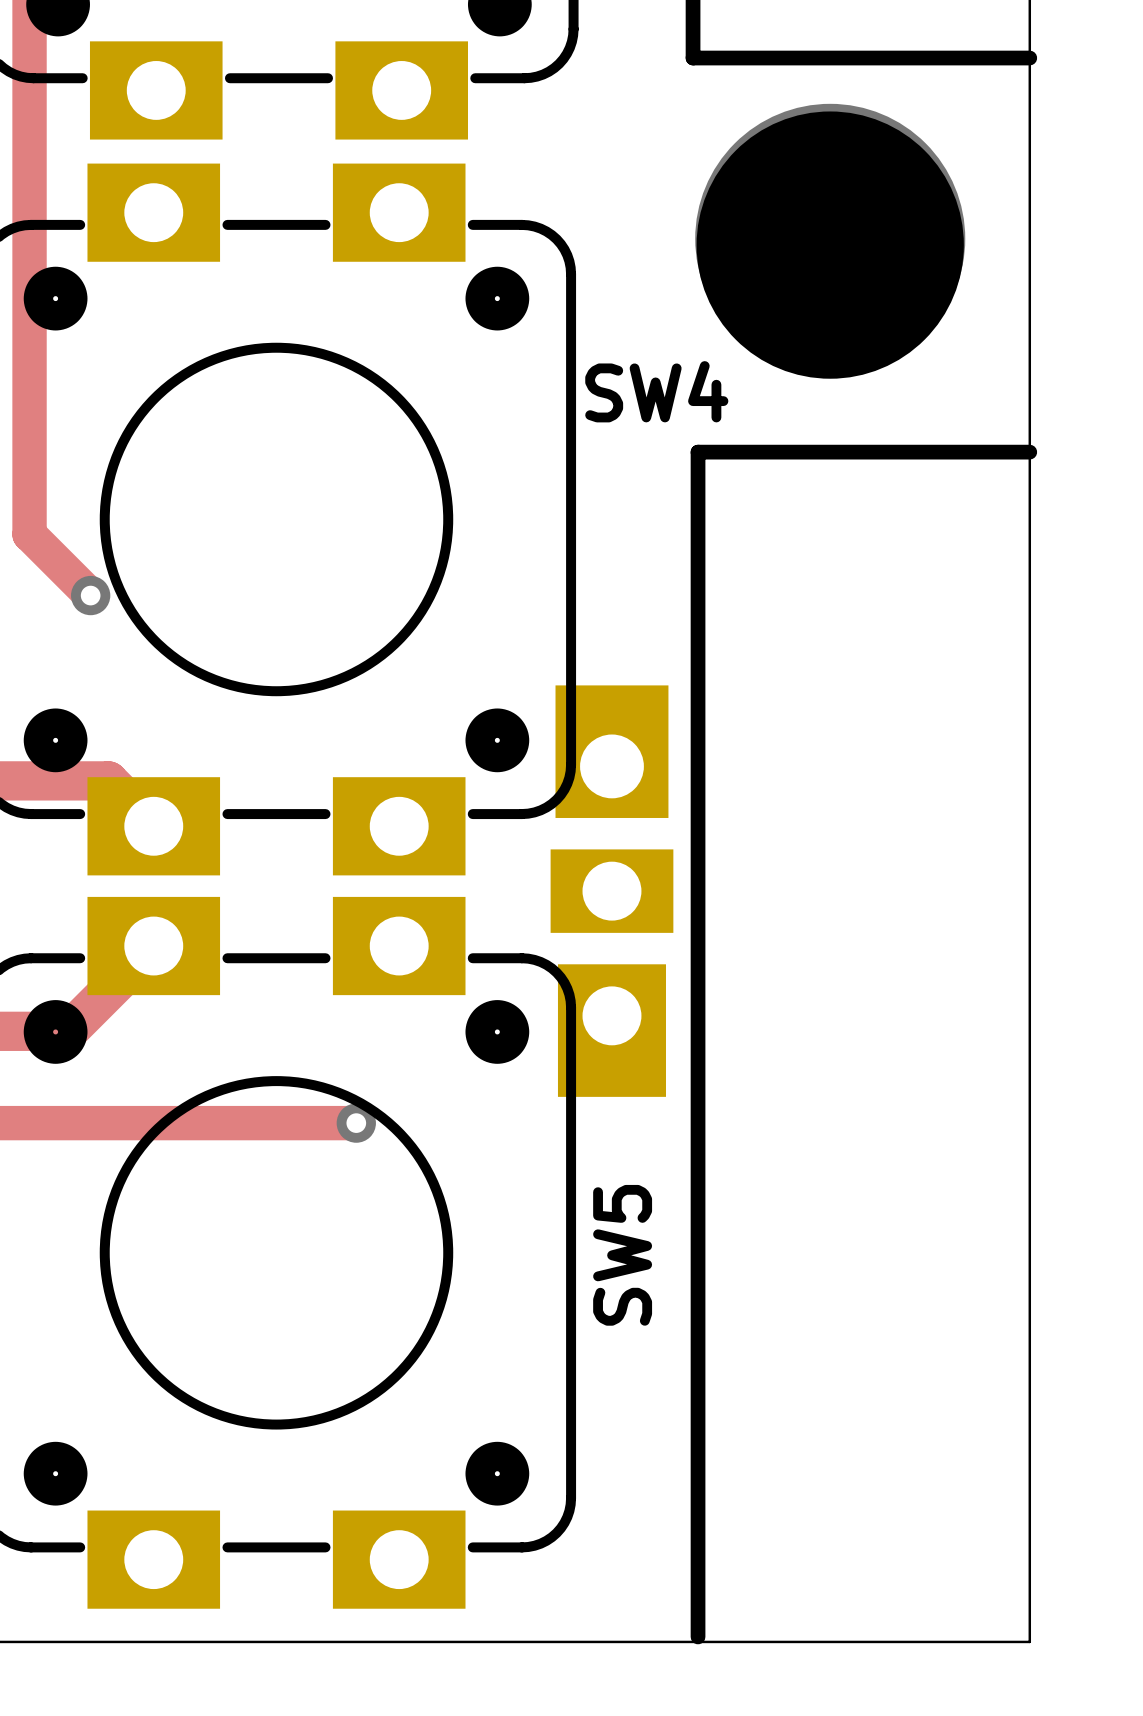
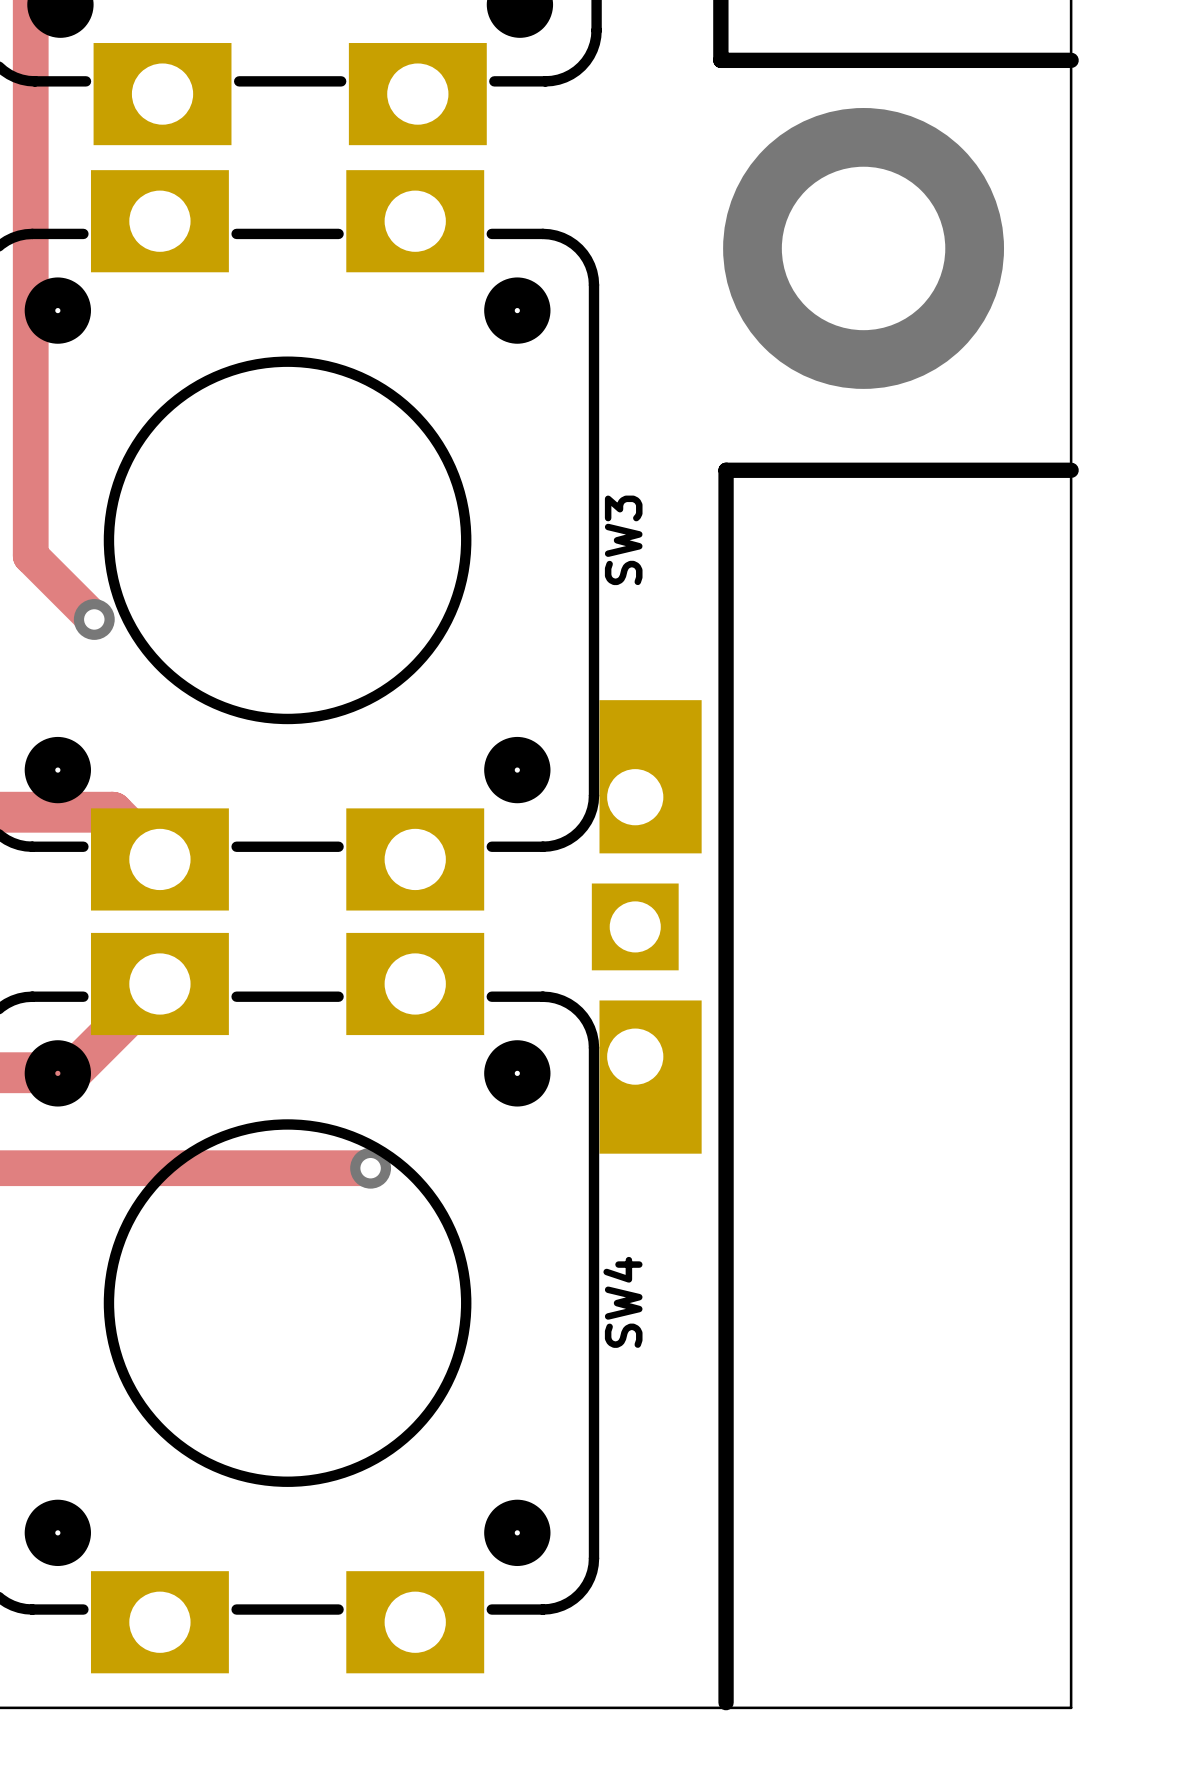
drawing: [696, 111, 964, 379] -> none
SW4 name: SW4 (656, 391) -> SW3 (623, 540)
part footprint: [550, 685, 674, 1097] -> [591, 700, 702, 1154]
SW5 name: SW5 (622, 1255) -> SW4 (622, 1302)

